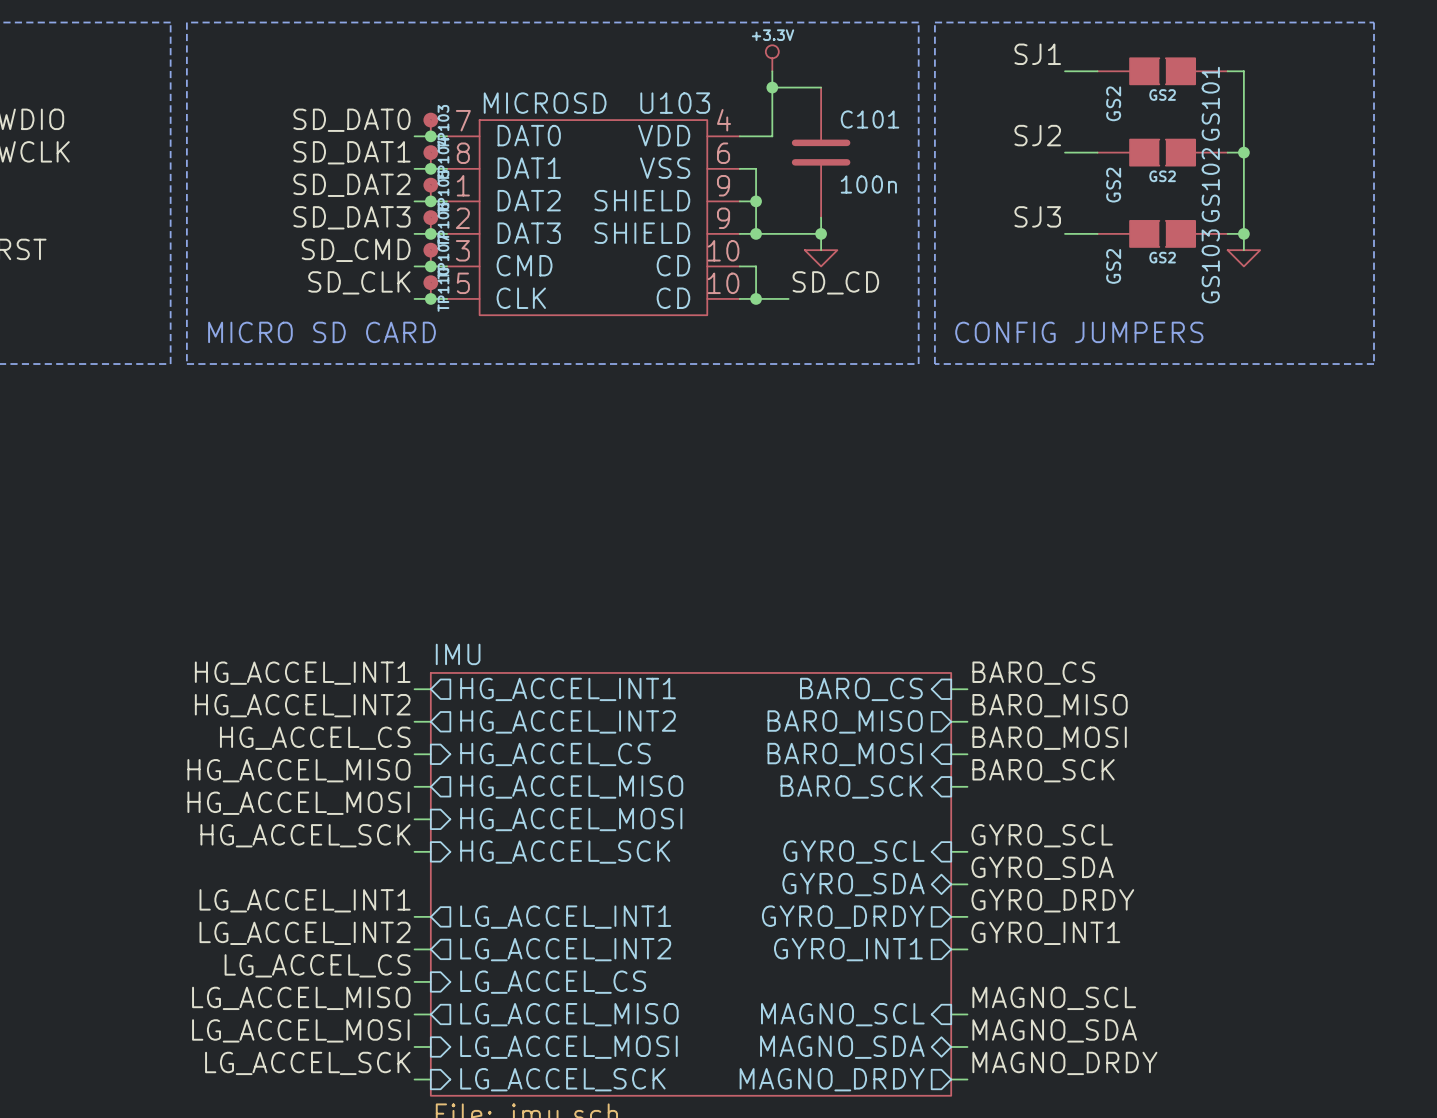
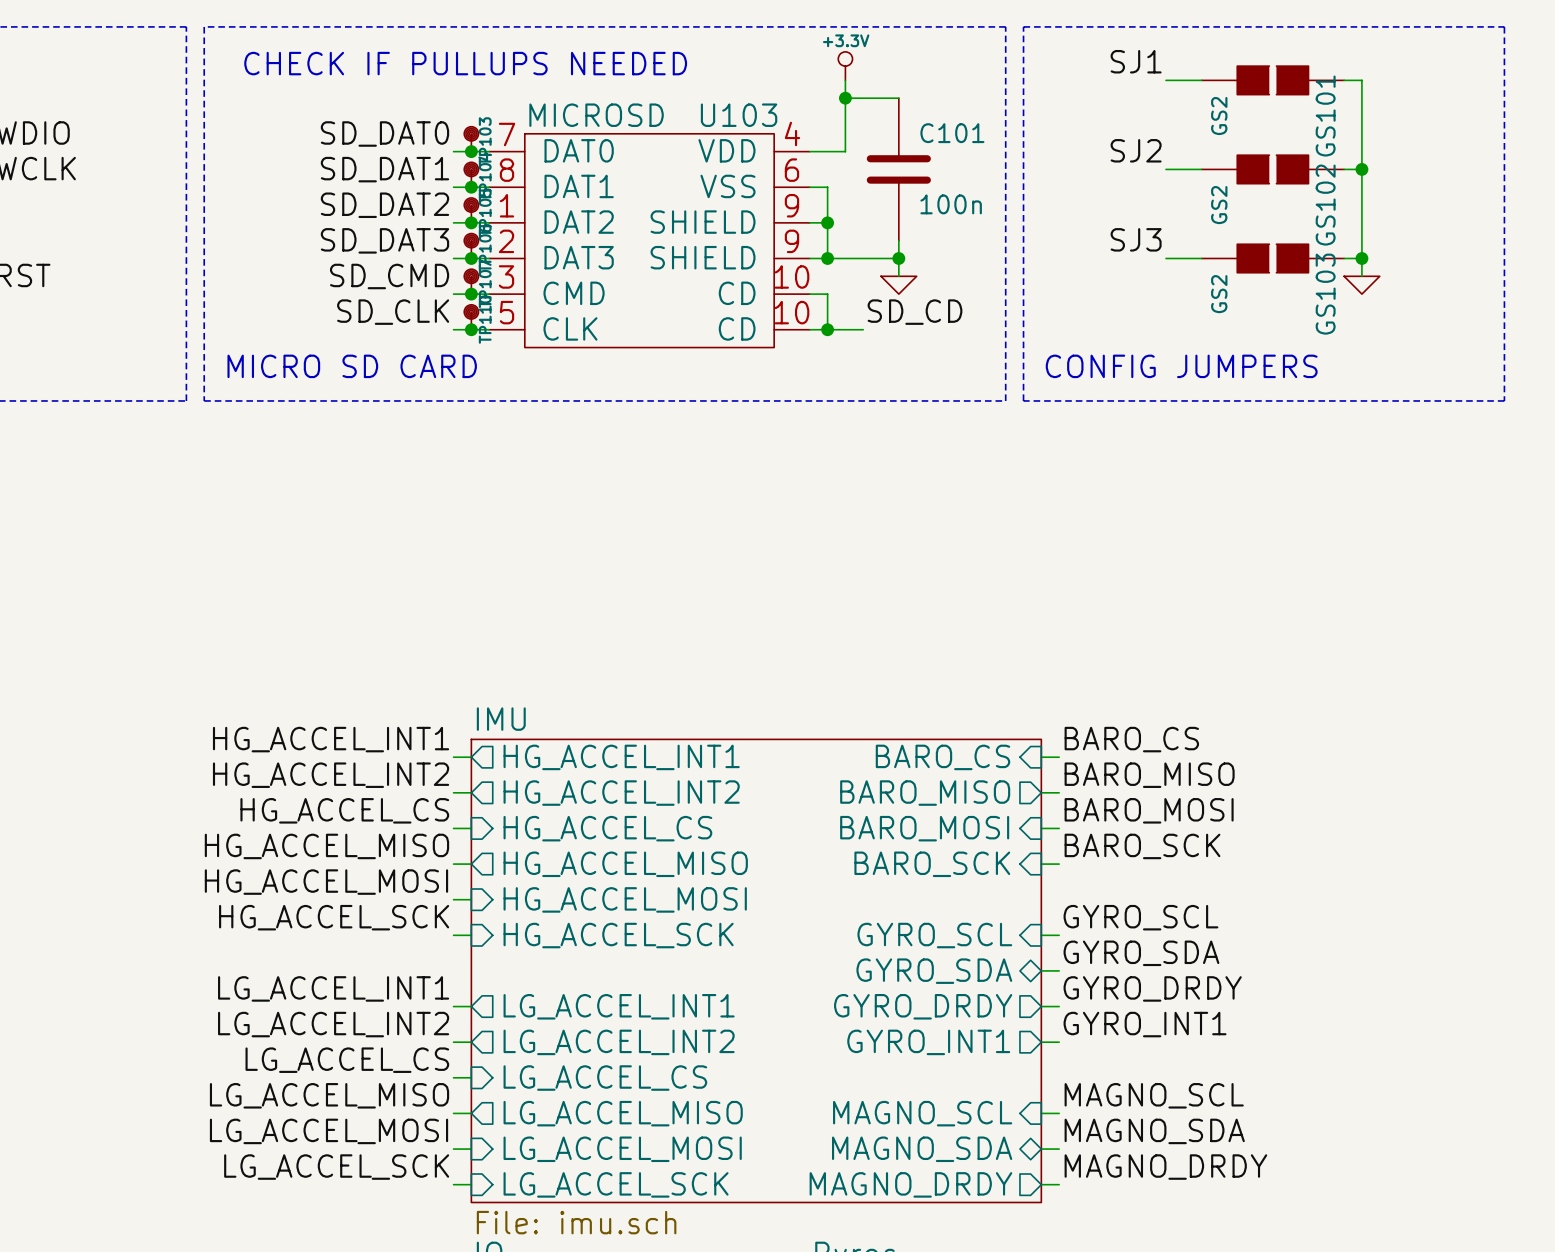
text: none -> CHECK IF PULLUPS NEEDED (465, 63)
GS101 text: GS2 (1162, 95) -> none
GS102 text: GS2 (1162, 176) -> none
GS103 text: GS2 (1162, 257) -> none

